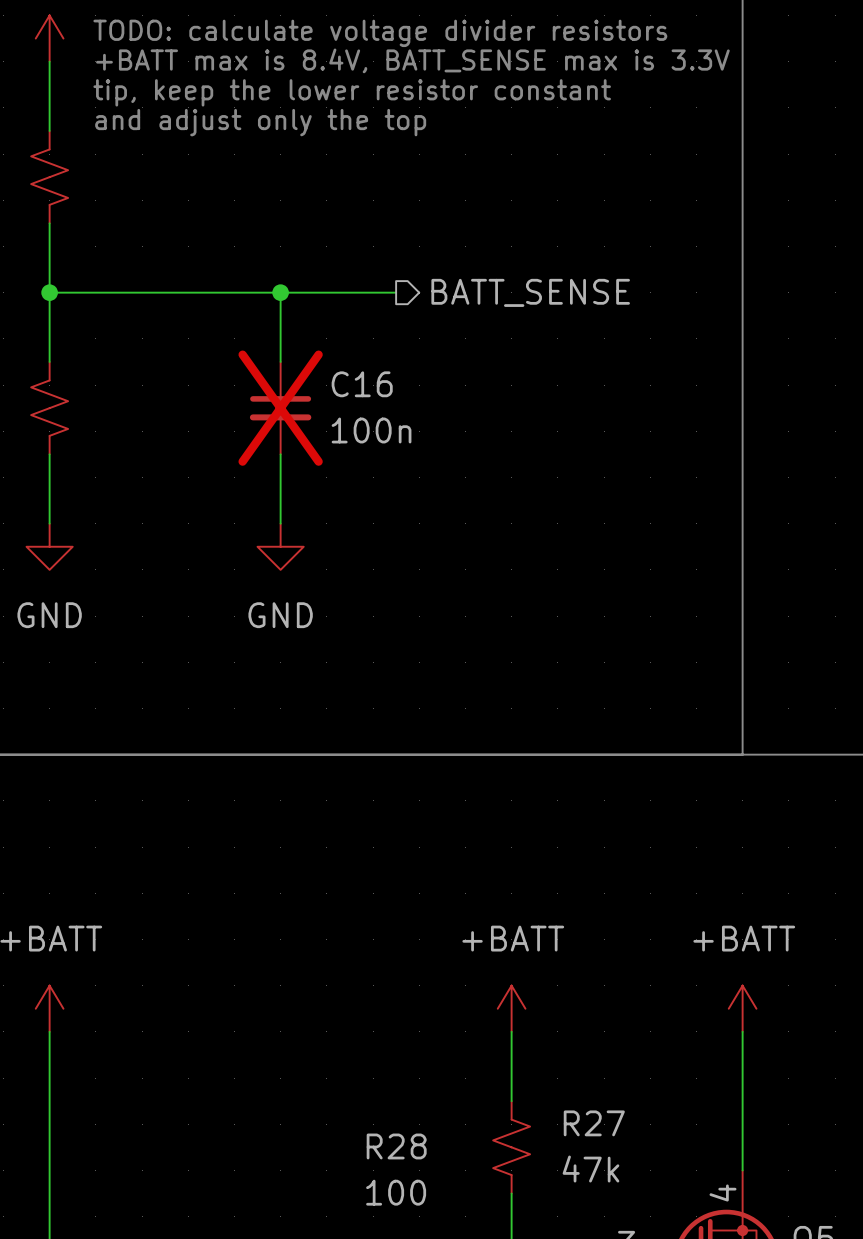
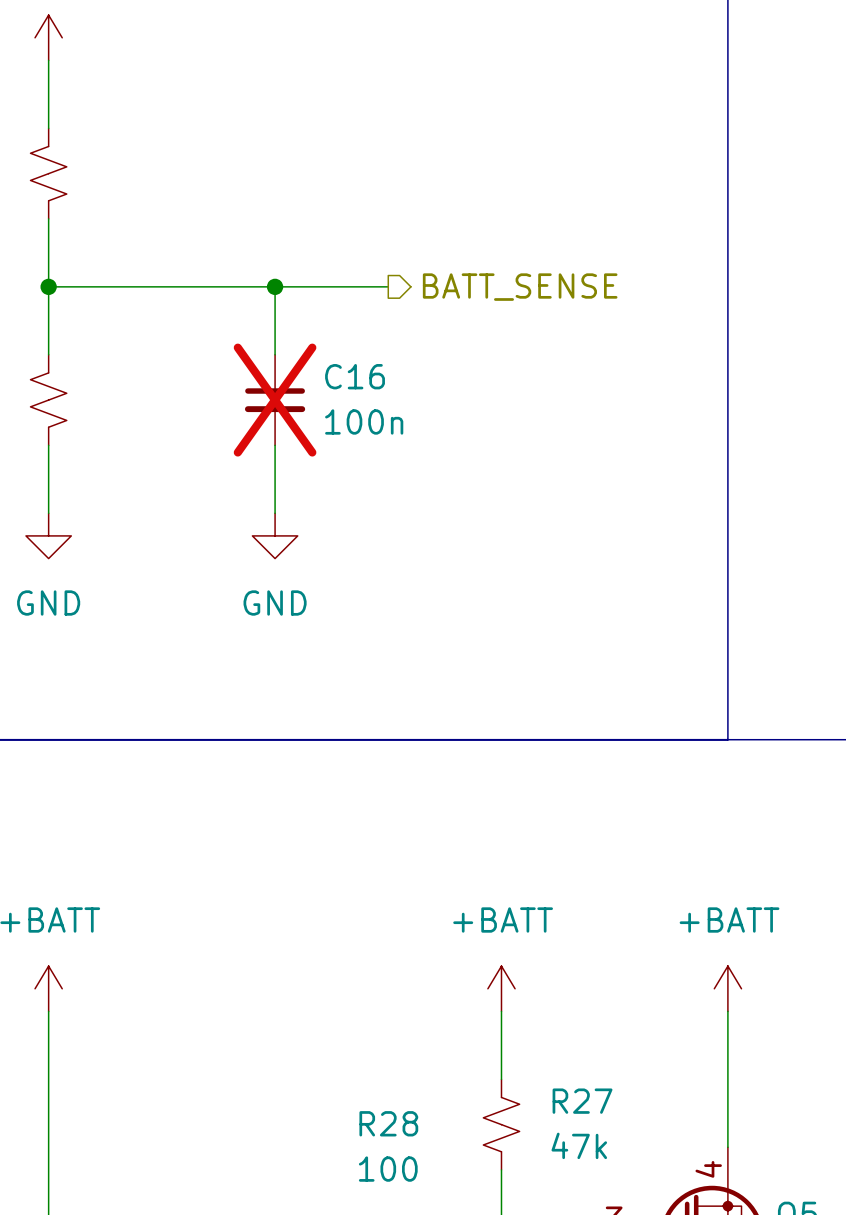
text: TODO: calculate voltage divider resistors (380, 33) -> none
text: +BATT max is 8.4V, BATT_SENSE max is 3.3V (412, 60) -> none
text: tip, keep the lower resistor constant (352, 92) -> none
text: and adjust only the top (260, 122) -> none

